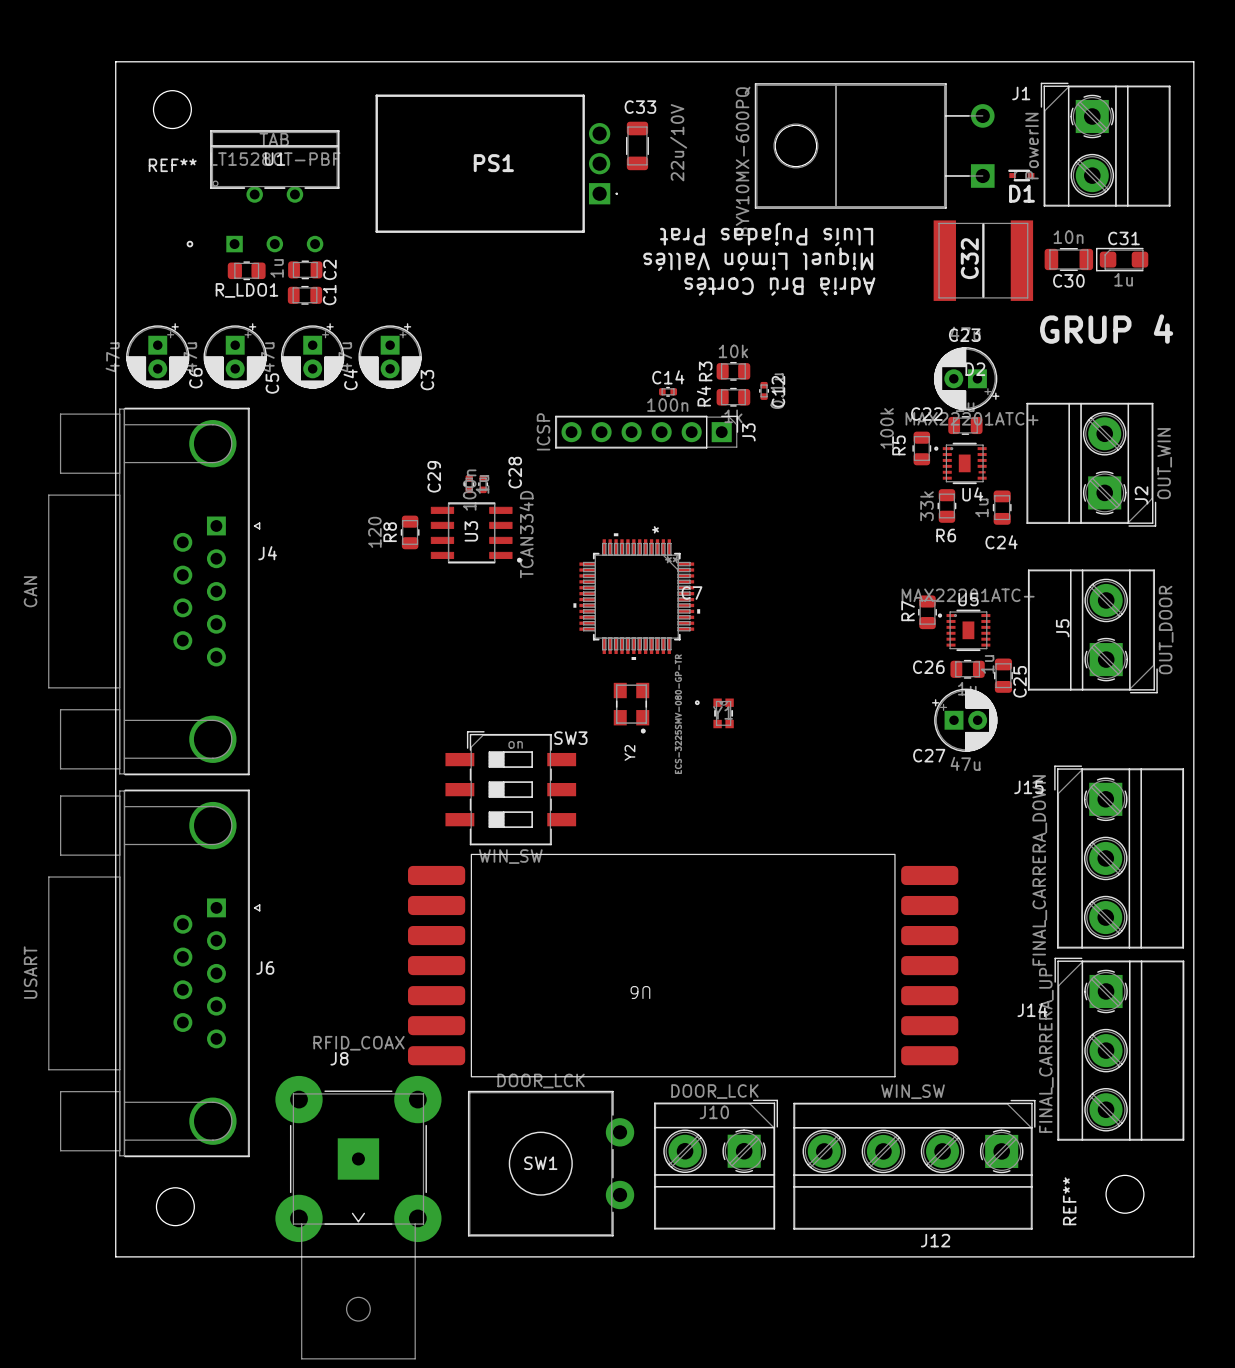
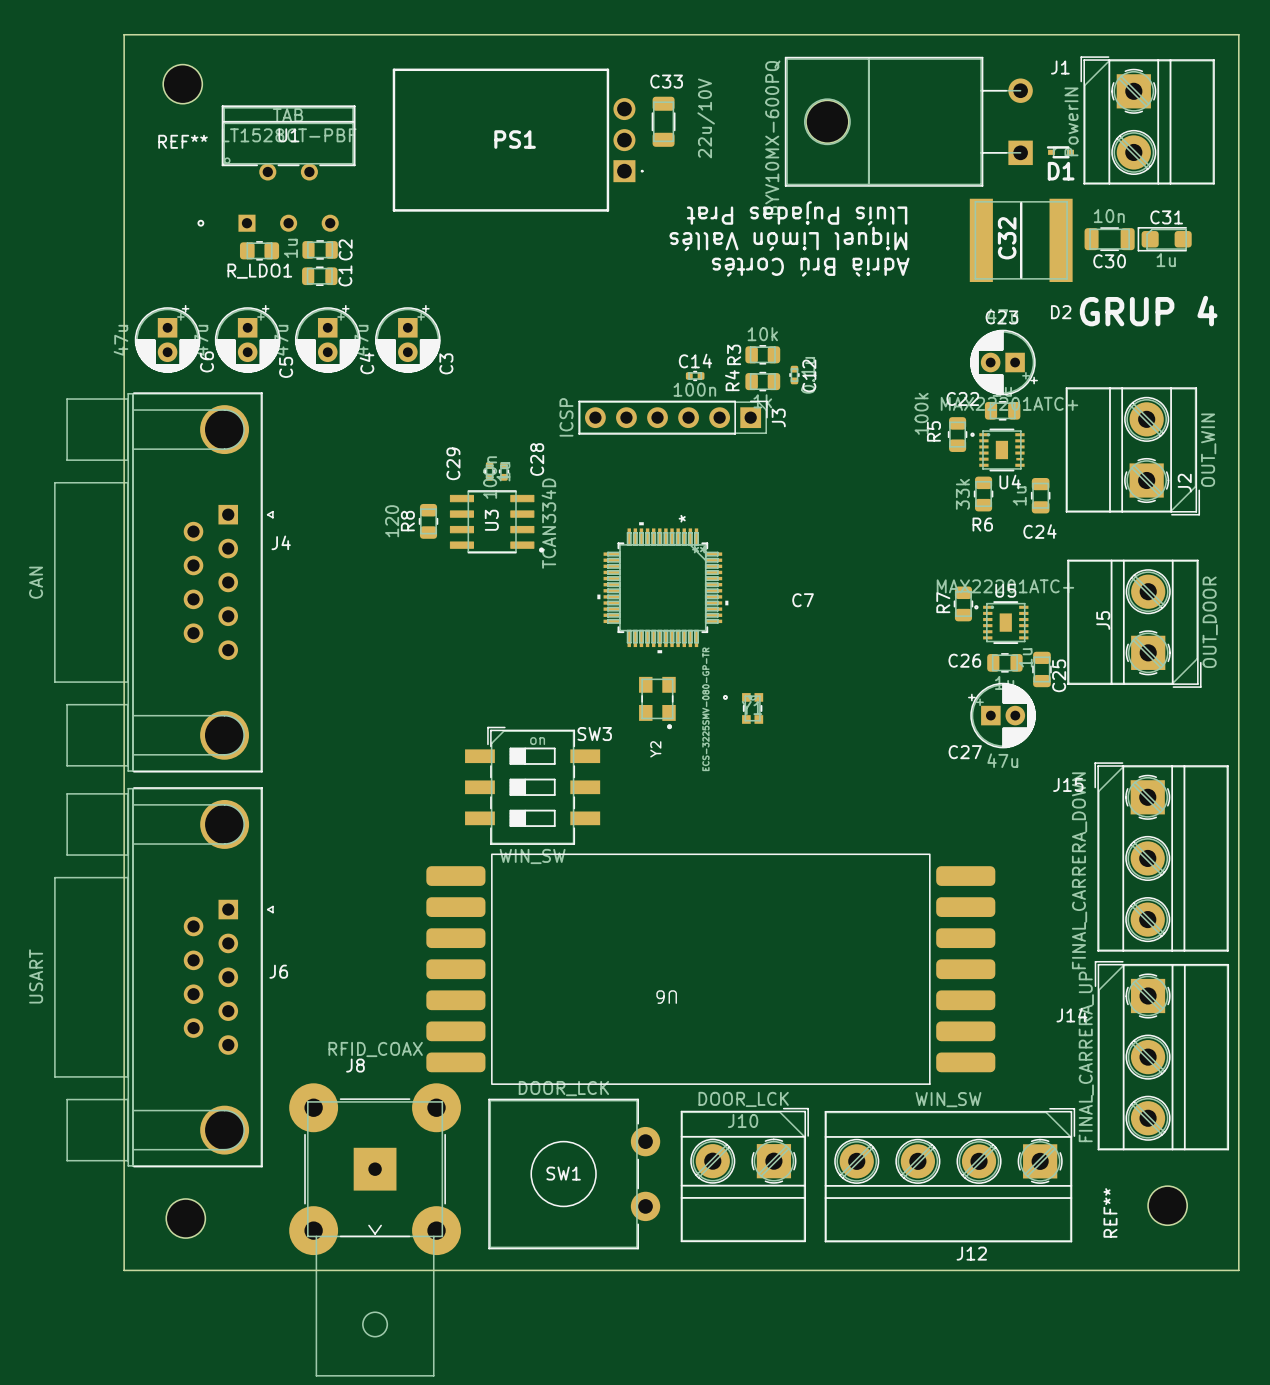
D2 name position: D2 (975, 369) -> D2 (1061, 312)
C7 position: (691, 593) -> (803, 600)

